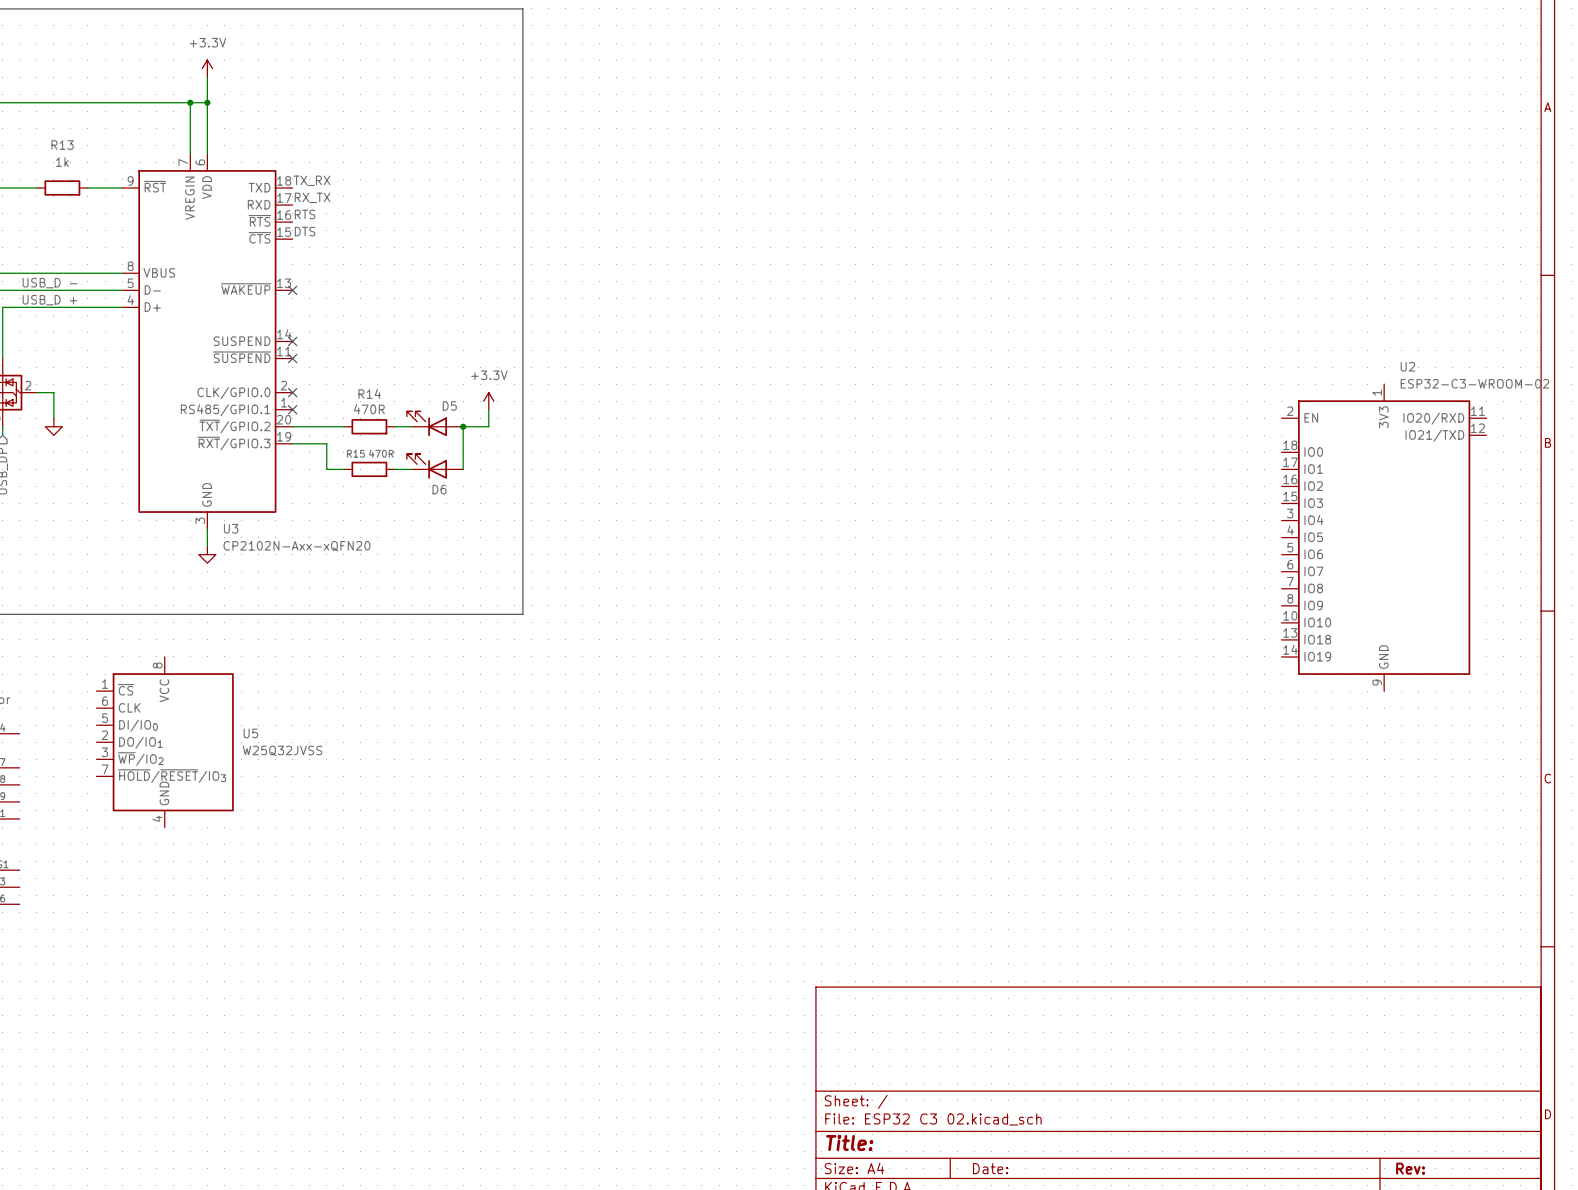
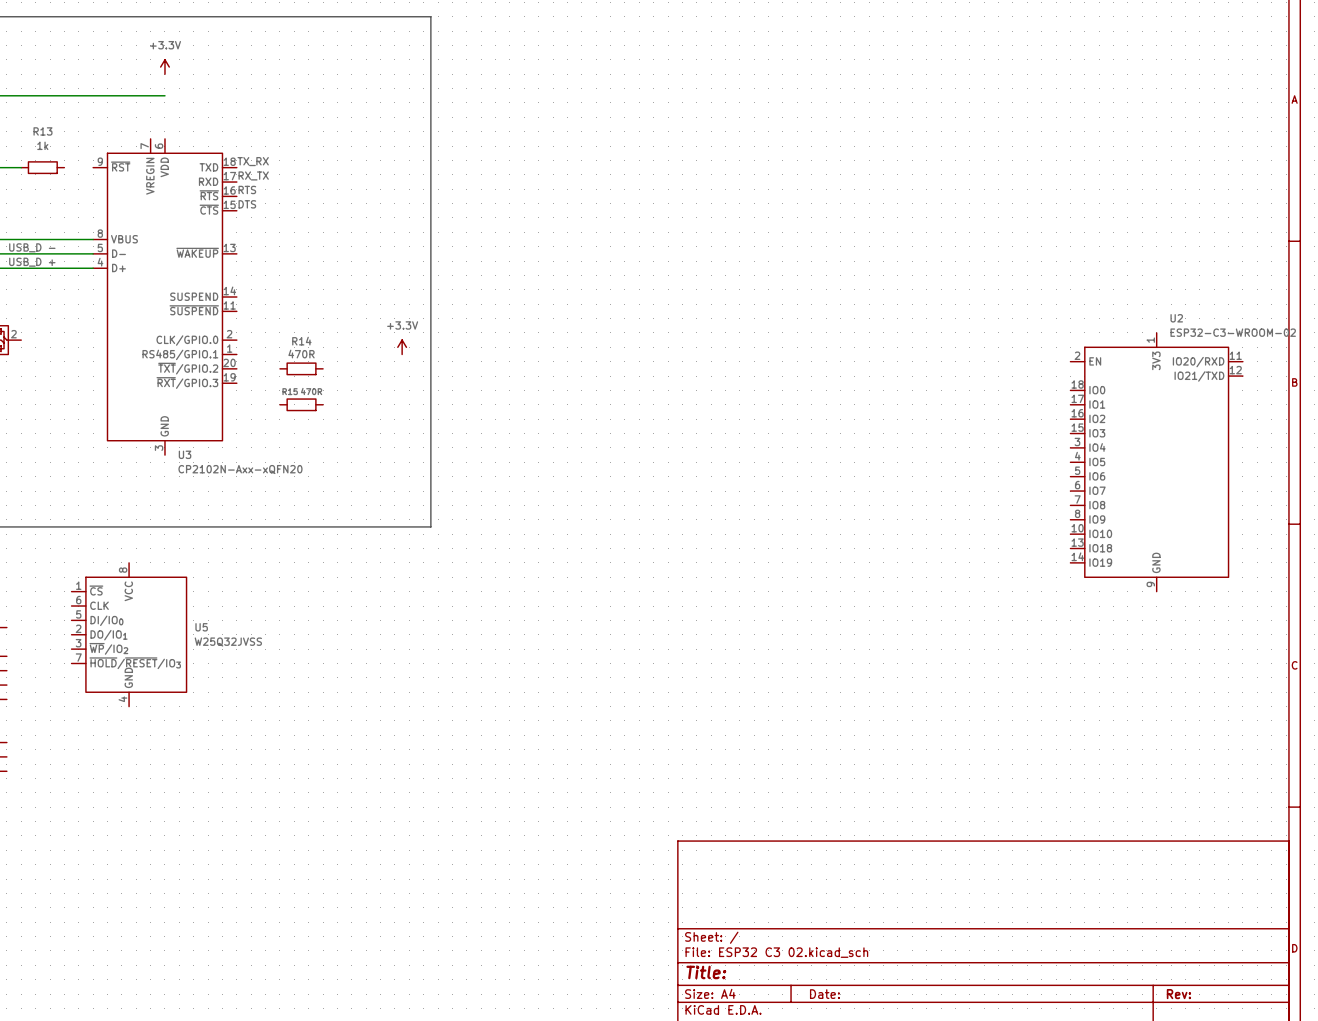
wire: (207, 77) (207, 153) -> none
wire: (190, 102) (190, 153) -> none
junction: (190, 102) -> none
junction: (207, 102) -> none
wire: (87, 187) (122, 187) -> none
no-connect mark: (292, 290) -> none
no-connect mark: (292, 341) -> none
no-connect mark: (292, 358) -> none
wire: (36, 392) (53, 392) (53, 418) -> none
no-connect mark: (292, 392) -> none
no-connect mark: (292, 409) -> none
wire: (488, 409) (488, 426) (463, 426) (463, 469) -> none
D5: (435, 423) -> none
power symbol: (53, 426) -> none
wire: (292, 426) (343, 426) -> none
wire: (394, 426) (412, 426) -> none
junction: (463, 426) -> none
wire: (292, 443) (326, 443) (326, 469) (343, 469) -> none
D6: (435, 466) -> none
wire: (394, 469) (412, 469) -> none
wire: (207, 529) (207, 546) -> none
power symbol: (207, 554) -> none

